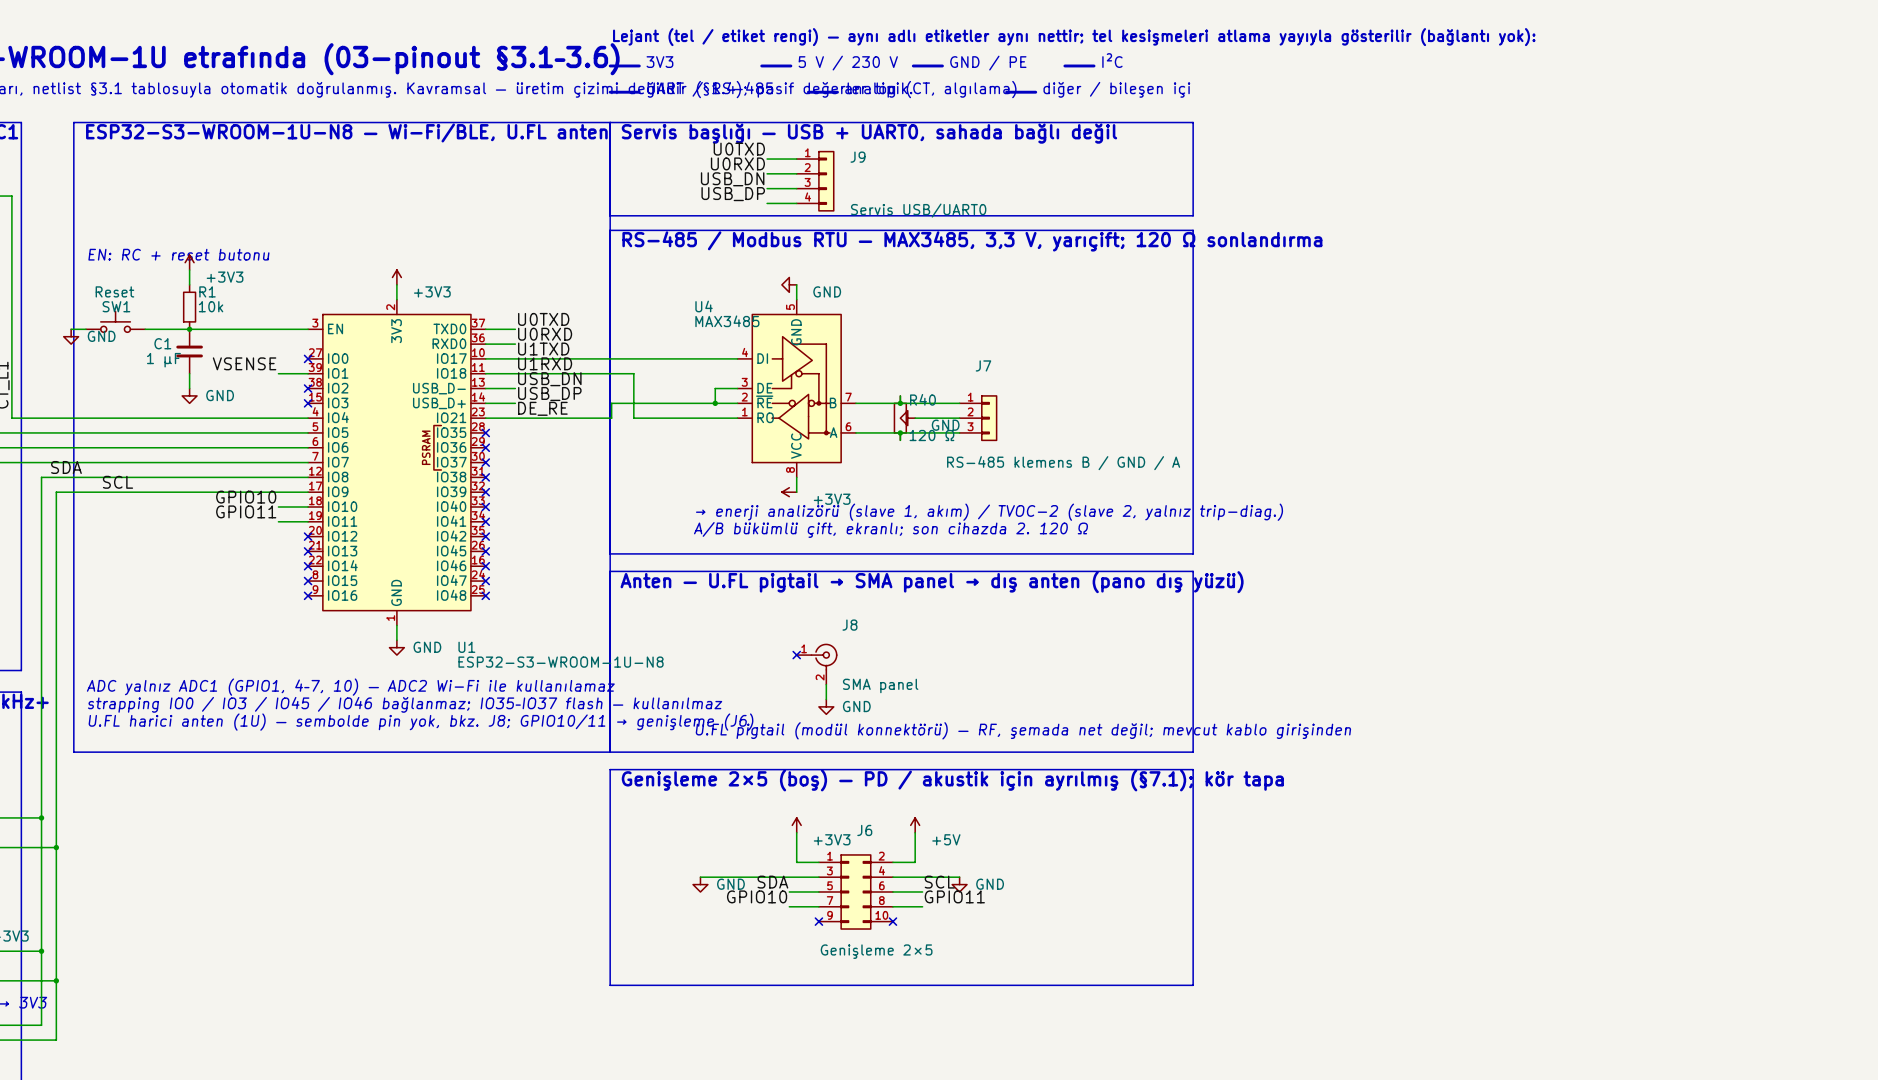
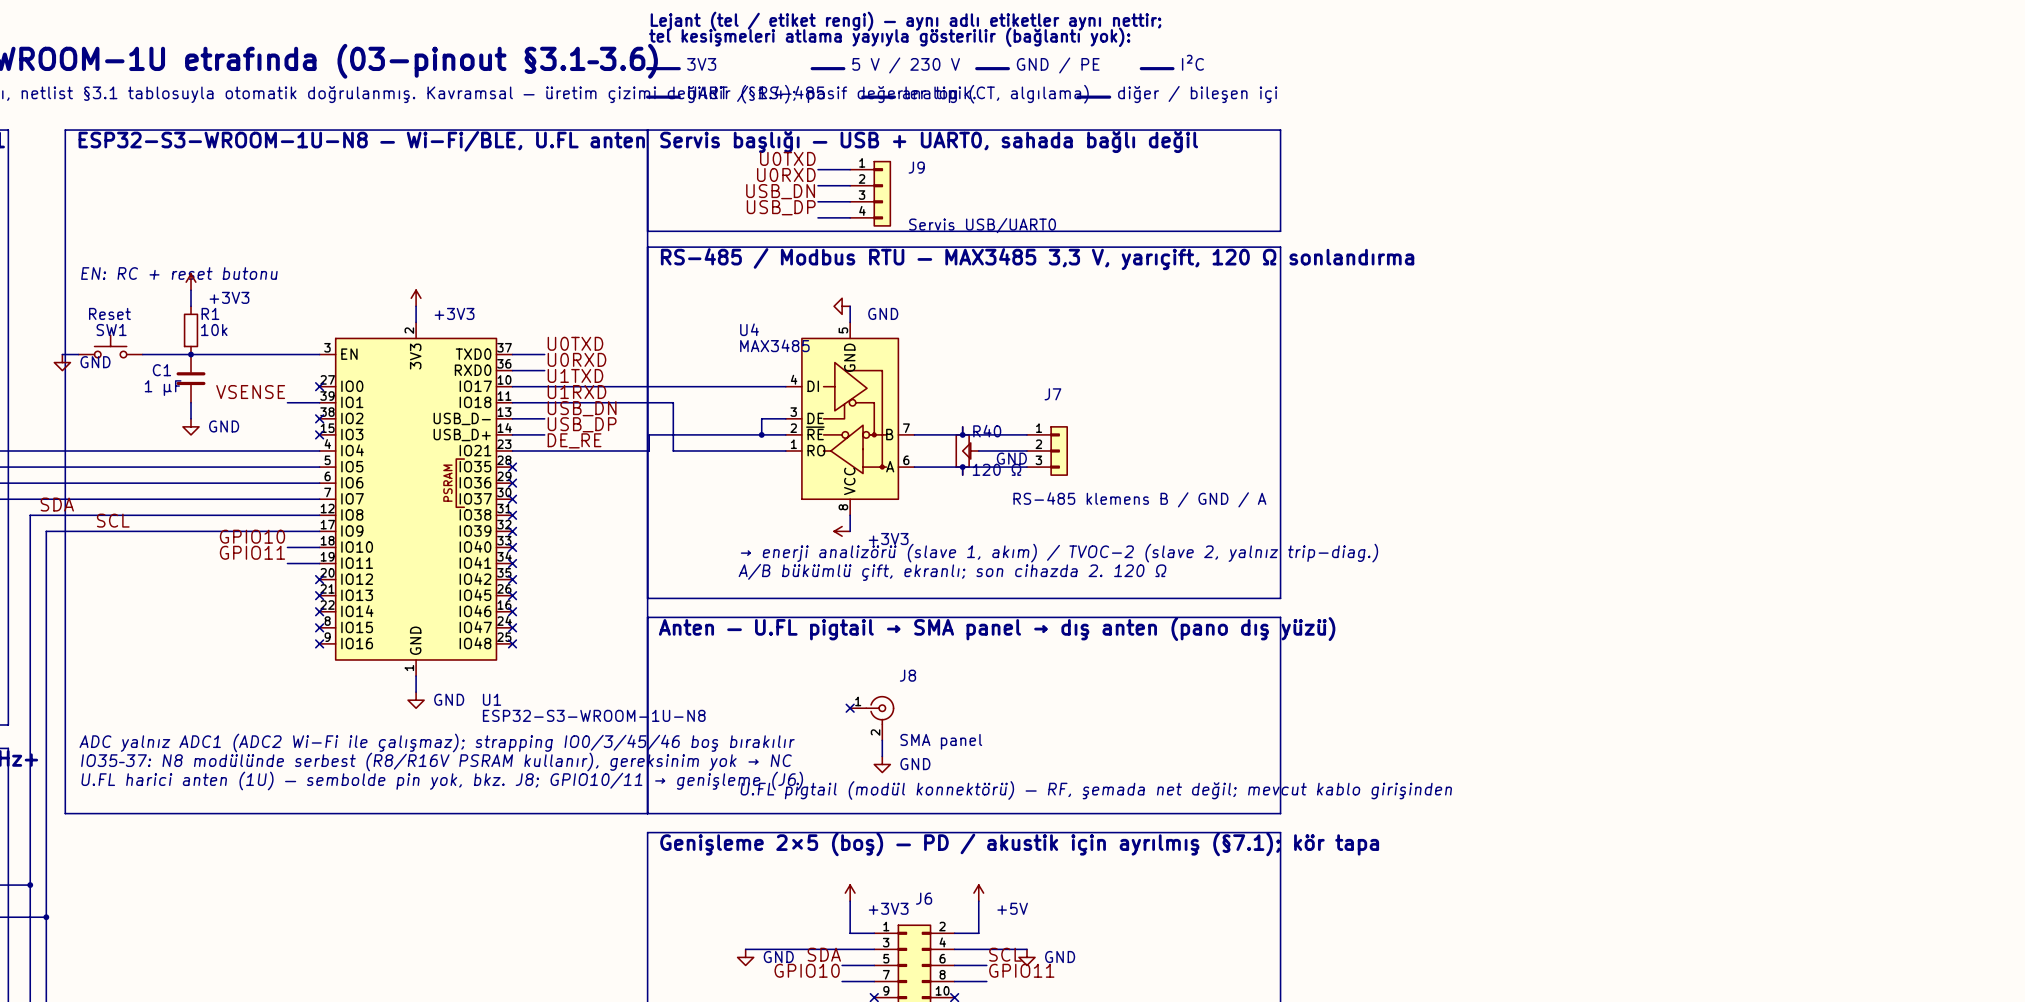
text: none -> Lejant (tel / etiket rengi) — aynı adlı etiketler aynı nettir; (905, 21)
text: Lejant (tel / etiket rengi) — aynı adlı etiketler aynı nettir; tel kesişmeleri atlama yayıyla gösterilir (bağlantı yok): (1074, 37) -> tel kesişmeleri atlama yayıyla gösterilir (bağlantı yok): (889, 37)
text: RS-485 / Modbus RTU — MAX3485, 3,3 V, yarıçift; 120 Ω sonlandırma (972, 241) -> RS-485 / Modbus RTU — MAX3485 3,3 V, yarıçift, 120 Ω sonlandırma (1037, 259)
text: ADC yalnız ADC1 (GPIO1, 4–7, 10) — ADC2 Wi-Fi ile kullanılamaz (350, 687) -> ADC yalnız ADC1 (ADC2 Wi-Fi ile çalışmaz); strapping IO0/3/45/46 boş bırakılır (437, 742)
text: strapping IO0 / IO3 / IO45 / IO46 bağlanmaz; IO35–IO37 flash — kullanılmaz (405, 704) -> IO35–37: N8 modülünde serbest (R8/R16V PSRAM kullanır), gereksinim yok → NC (436, 761)

